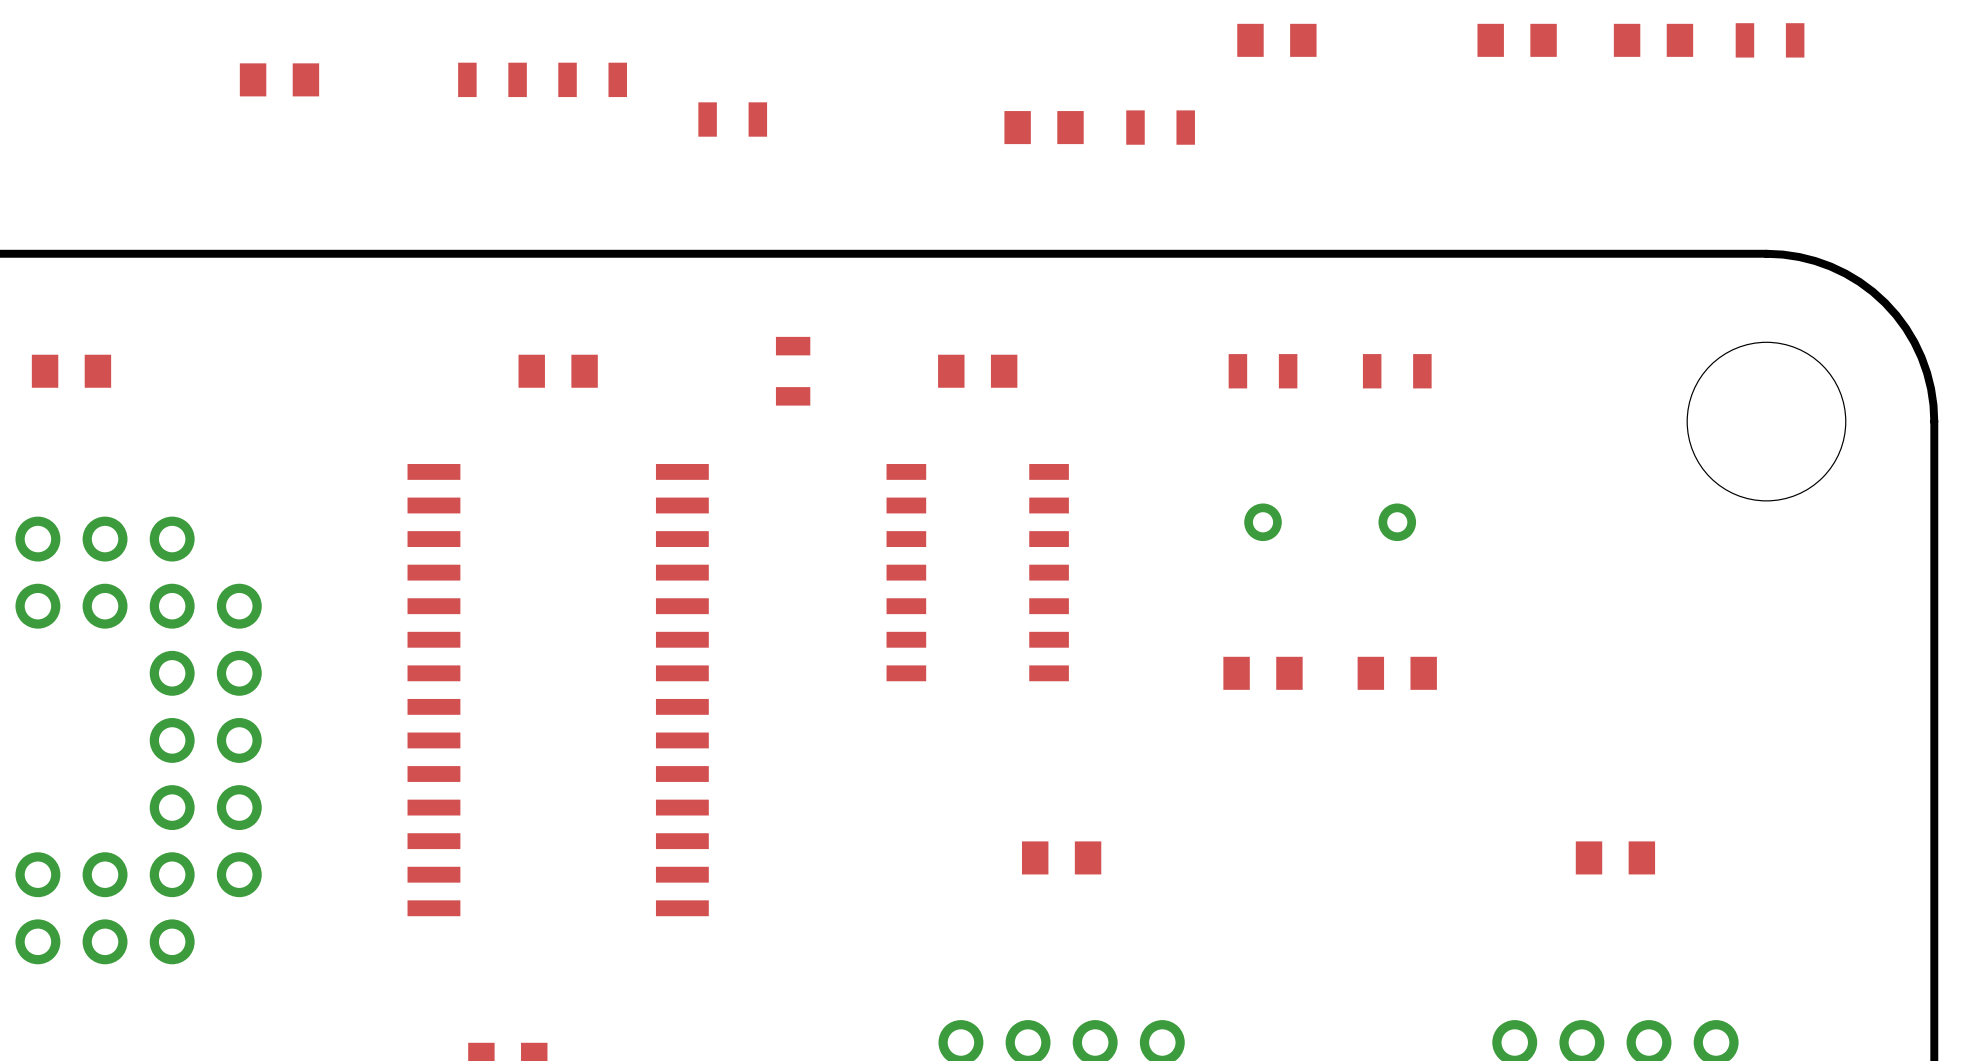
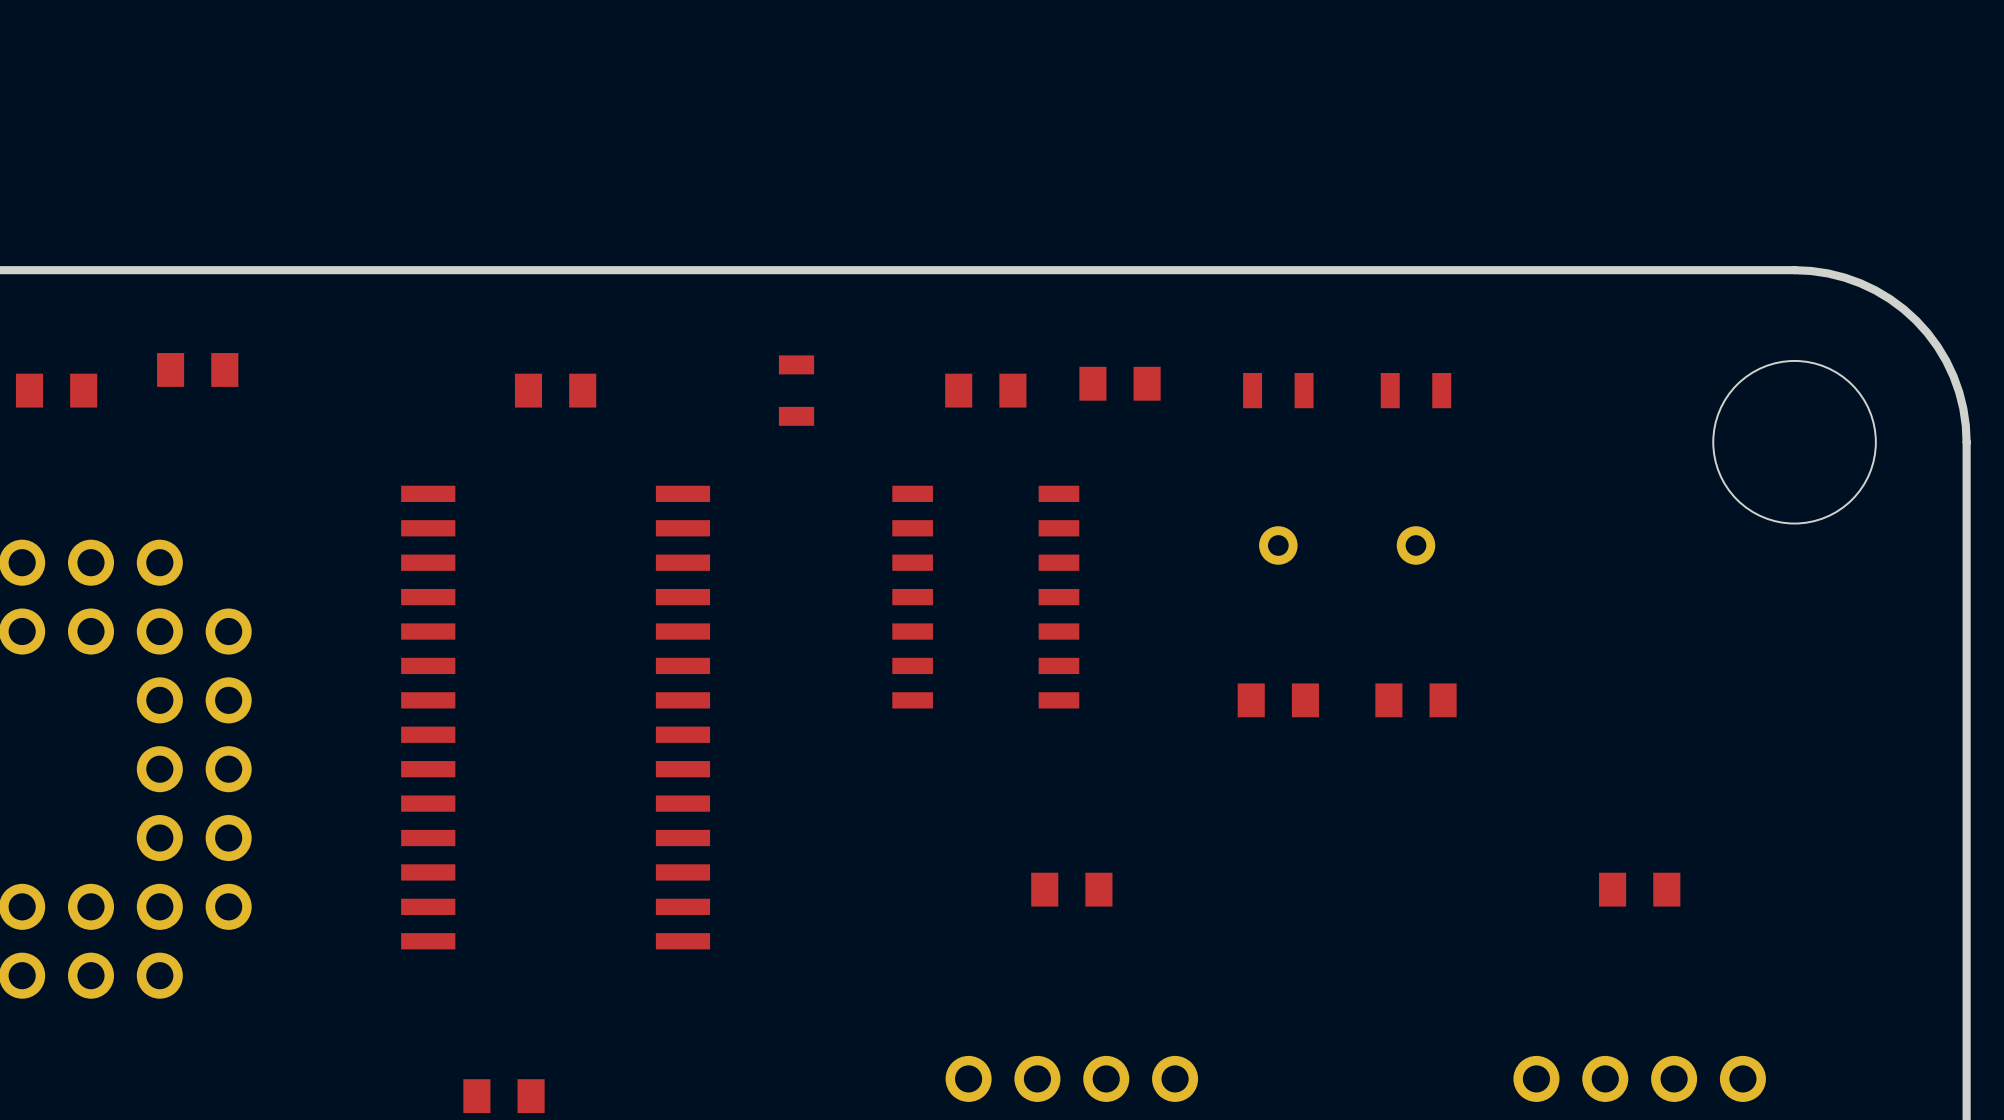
part: (1276, 40) -> none
part: (1517, 40) -> none
part: (1653, 40) -> none
part: (1770, 40) -> none
part position: (279, 79) -> (197, 369)
part: (492, 79) -> none
part: (592, 79) -> none
part: (732, 119) -> none
part: (1044, 127) -> none
part: (1160, 127) -> none
part: none -> (1120, 383)

